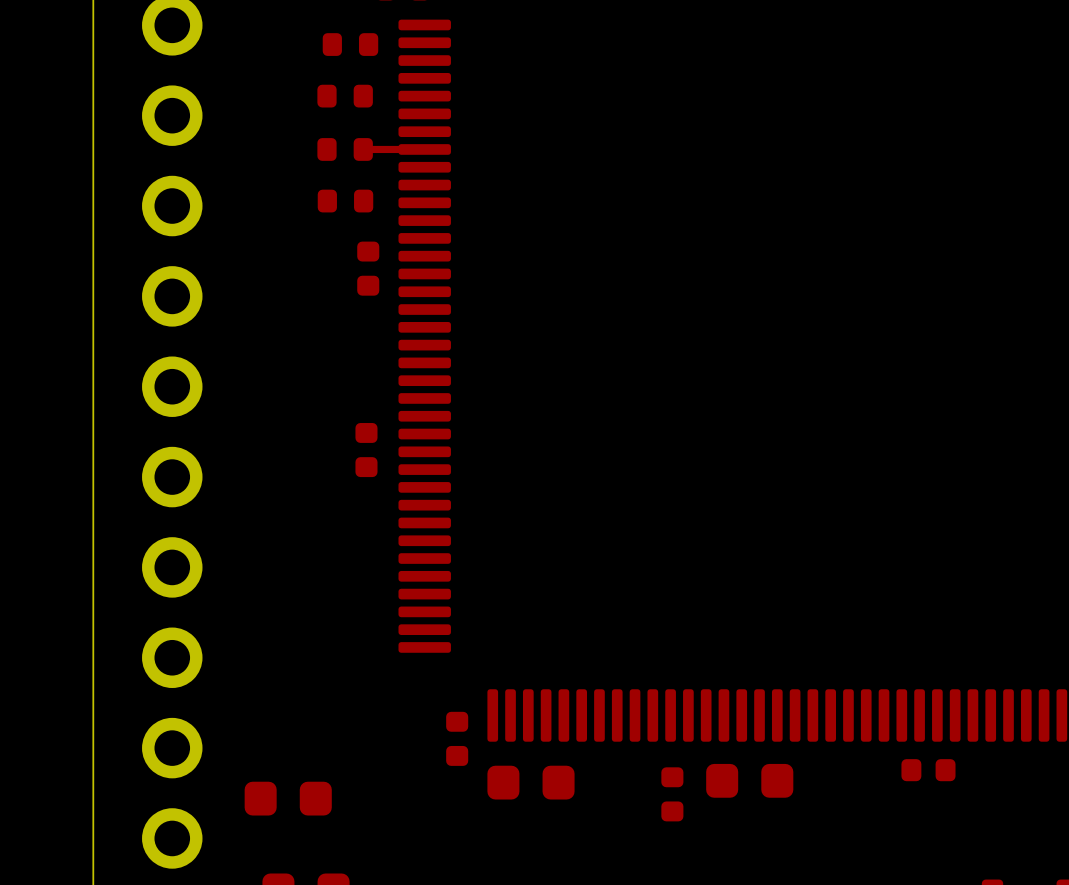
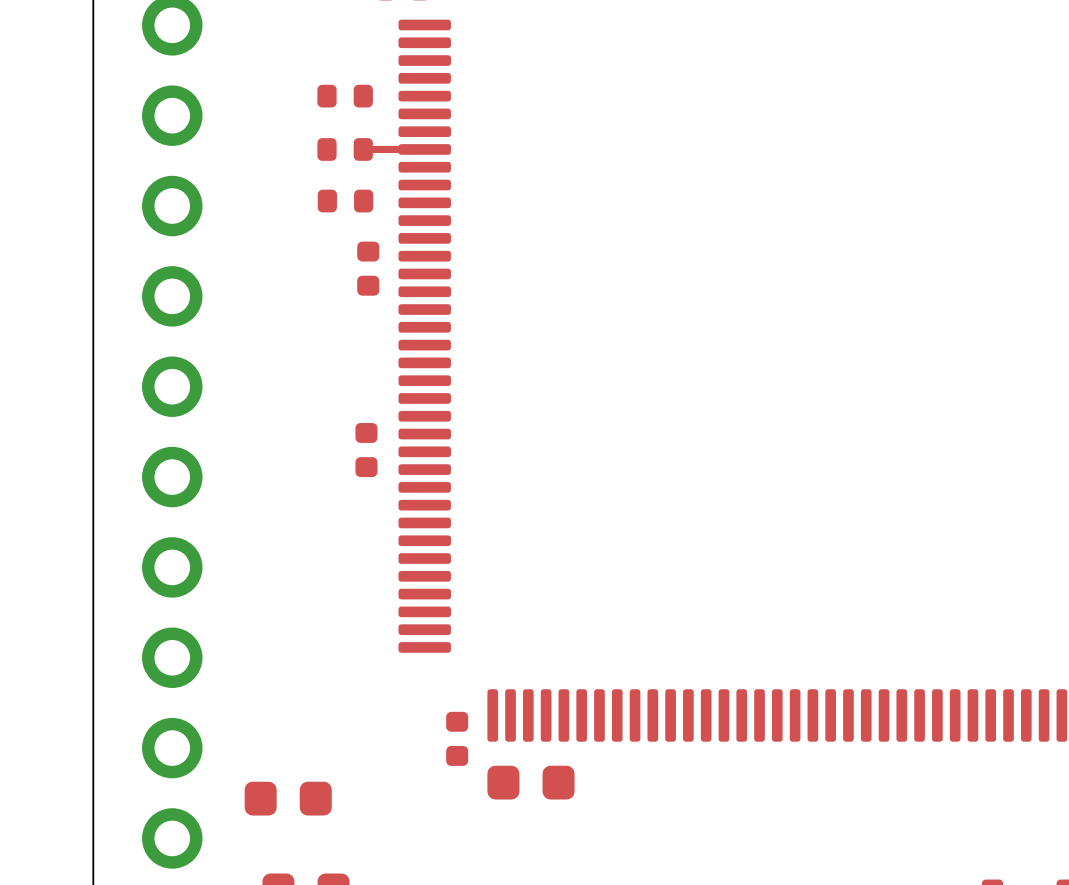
part: (350, 44) -> none
part: (928, 770) -> none
part: (749, 780) -> none
part: (672, 794) -> none

